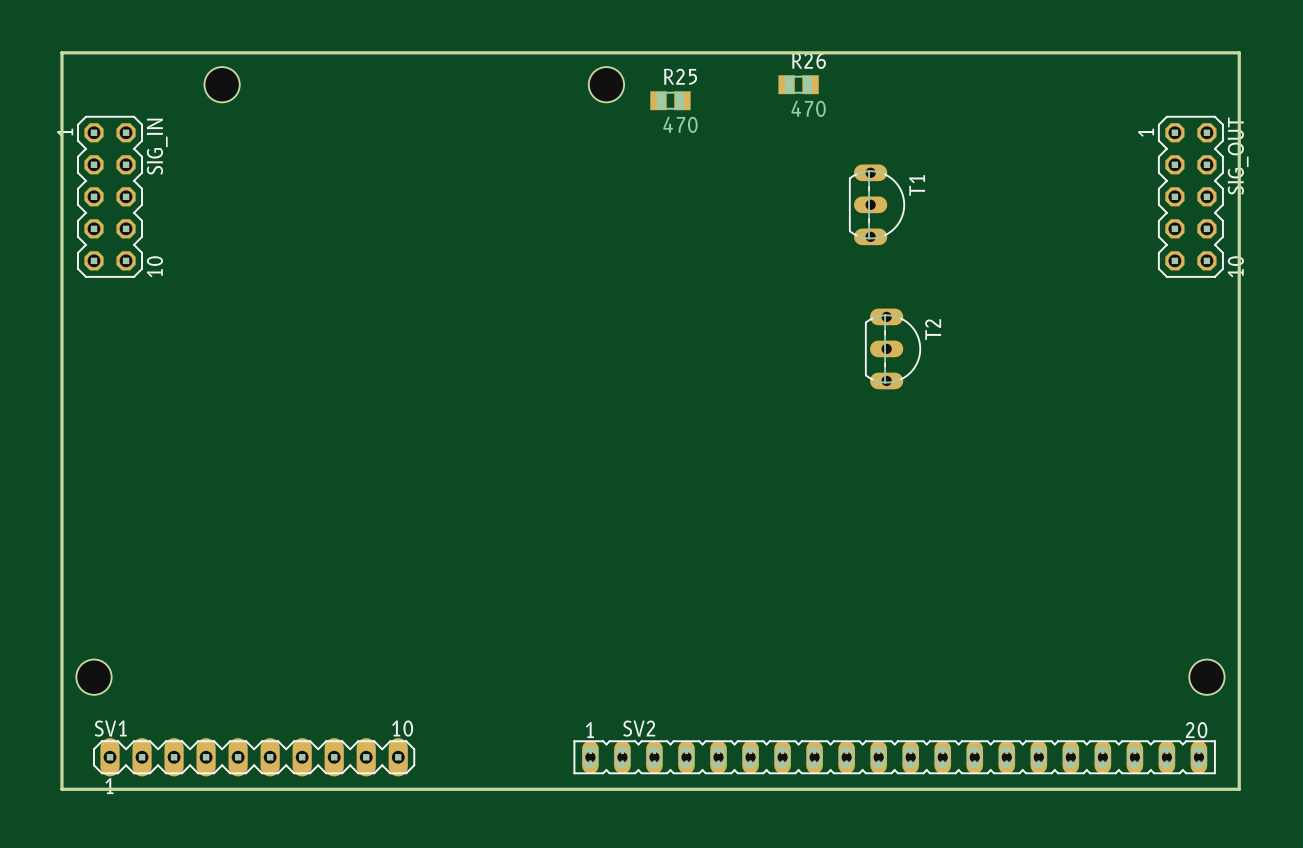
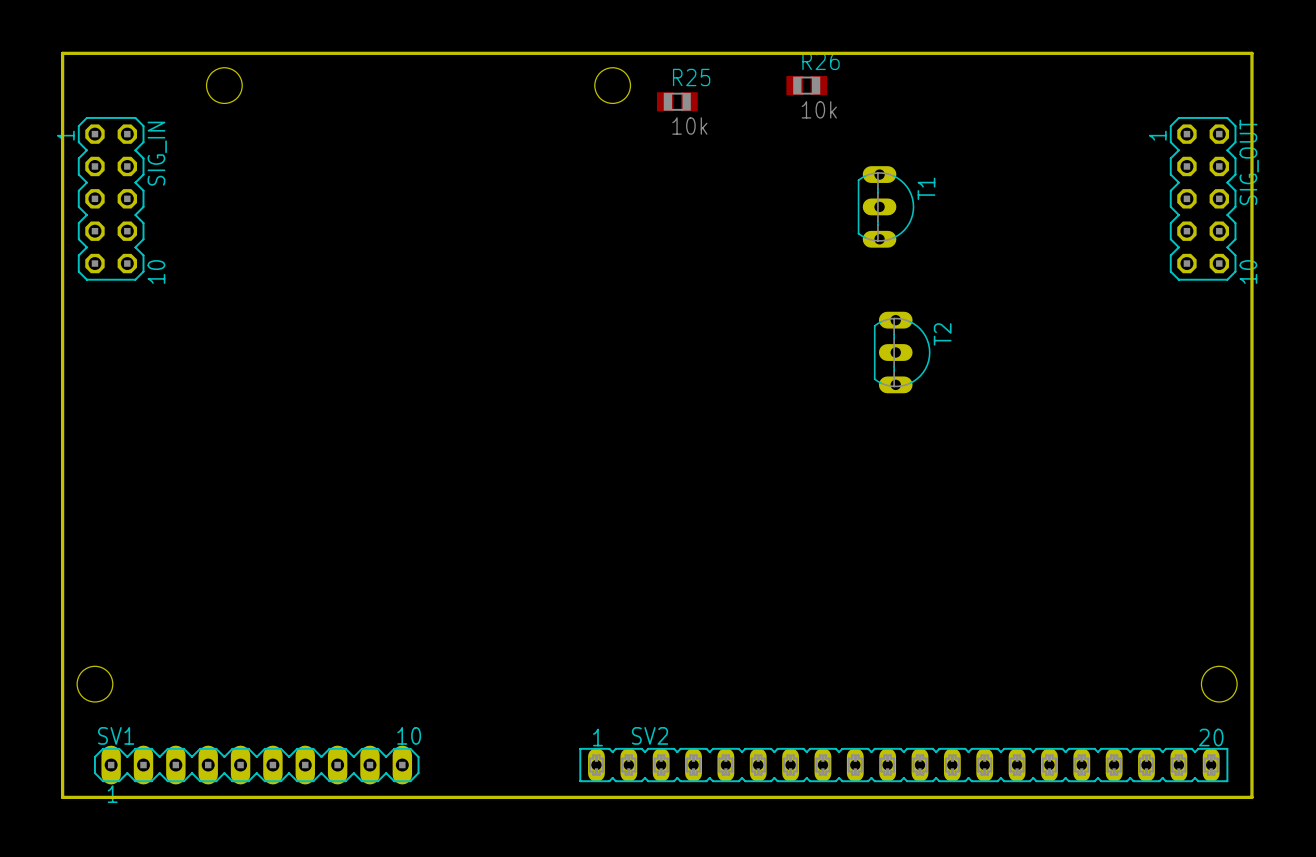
R26 value: 470 (808, 108) -> 10k (819, 109)
R25 value: 470 (680, 124) -> 10k (689, 126)

